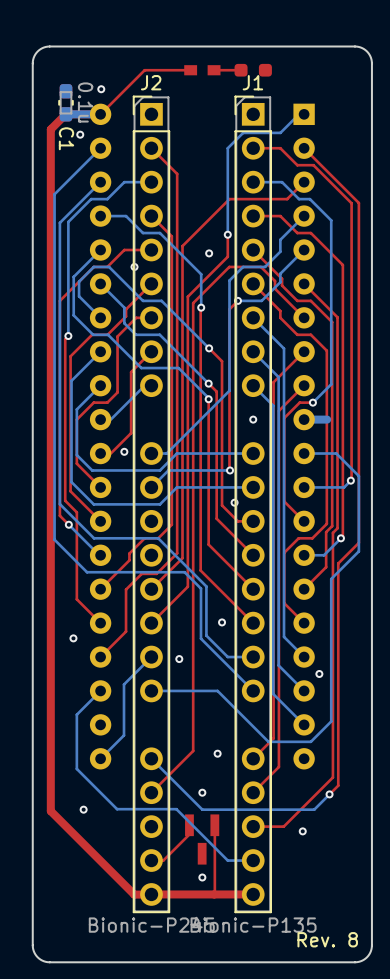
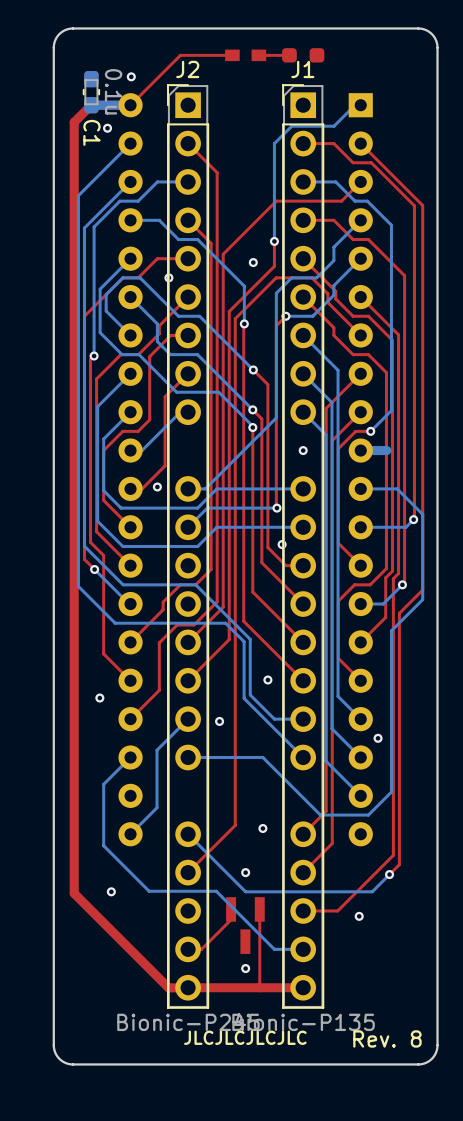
text: none -> JLCJLCJLCJLC (245, 1037)

